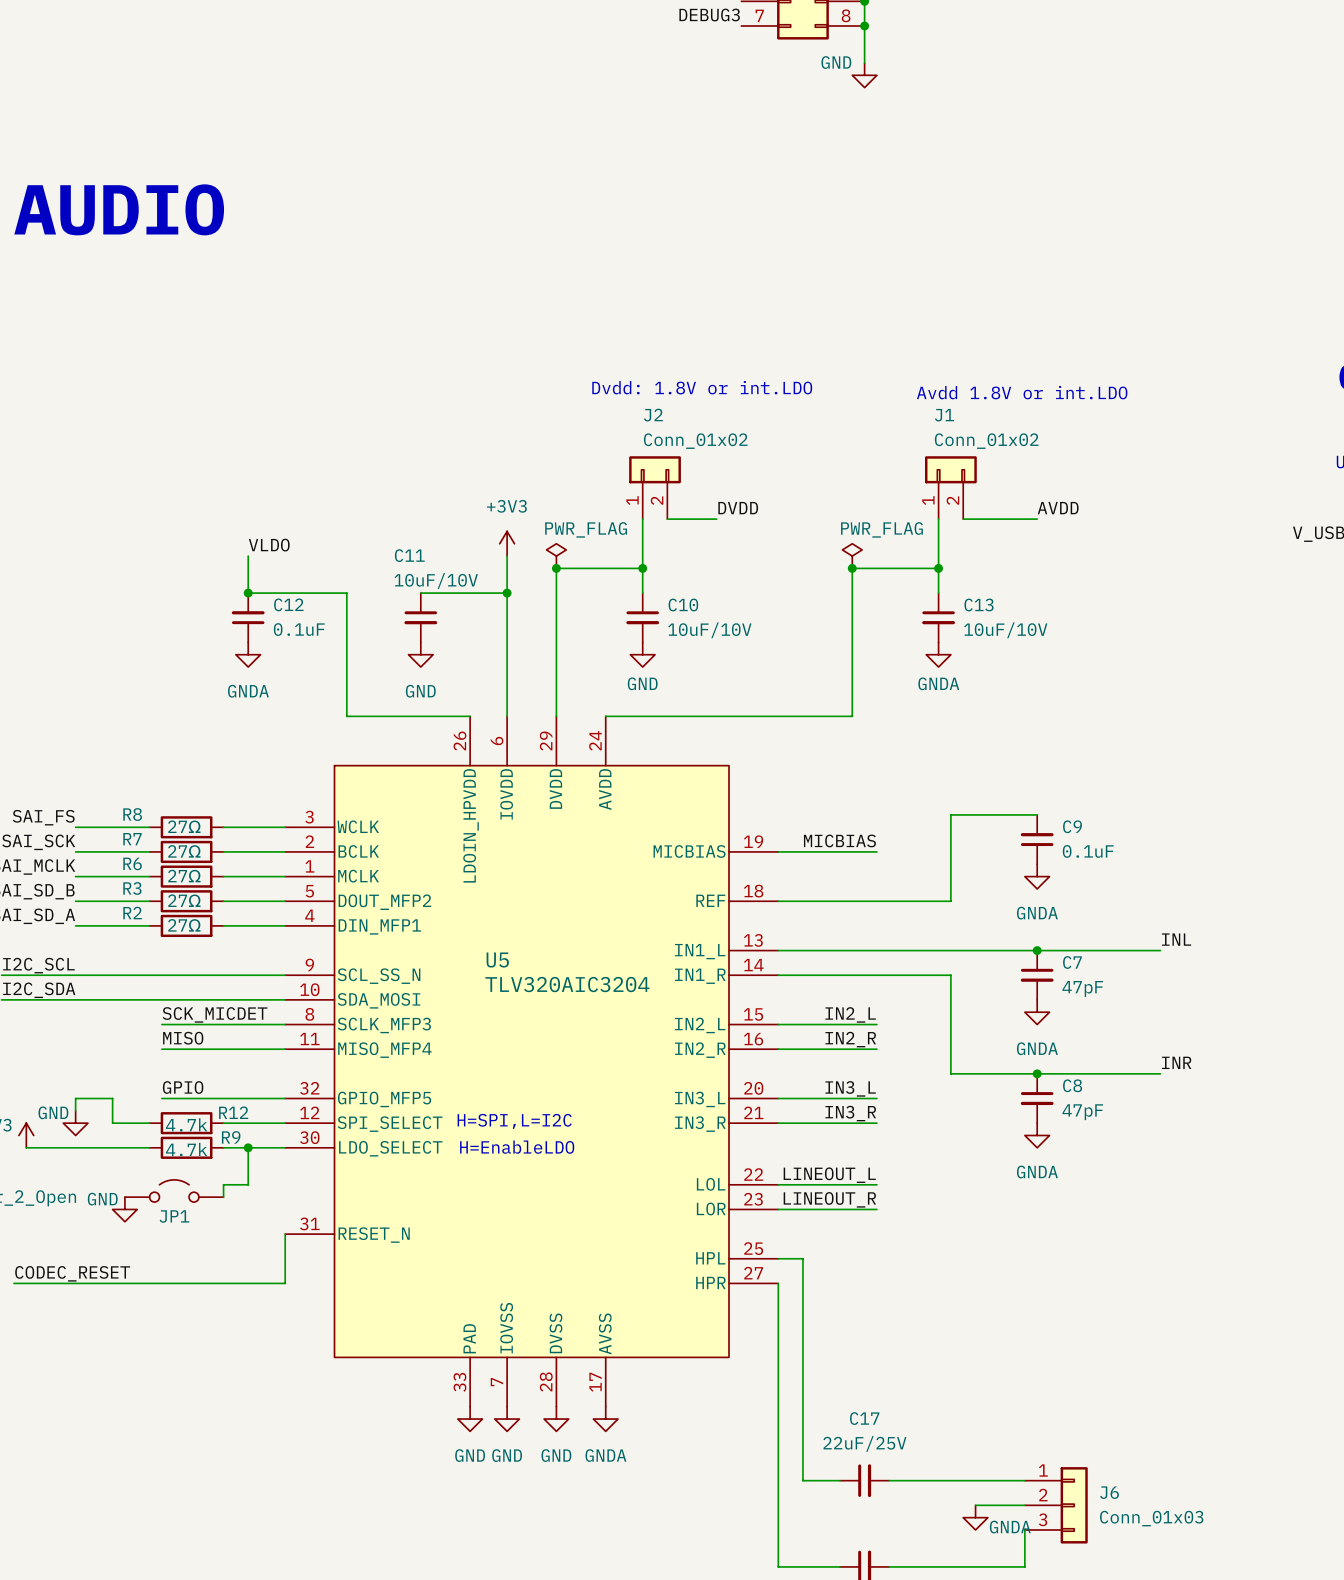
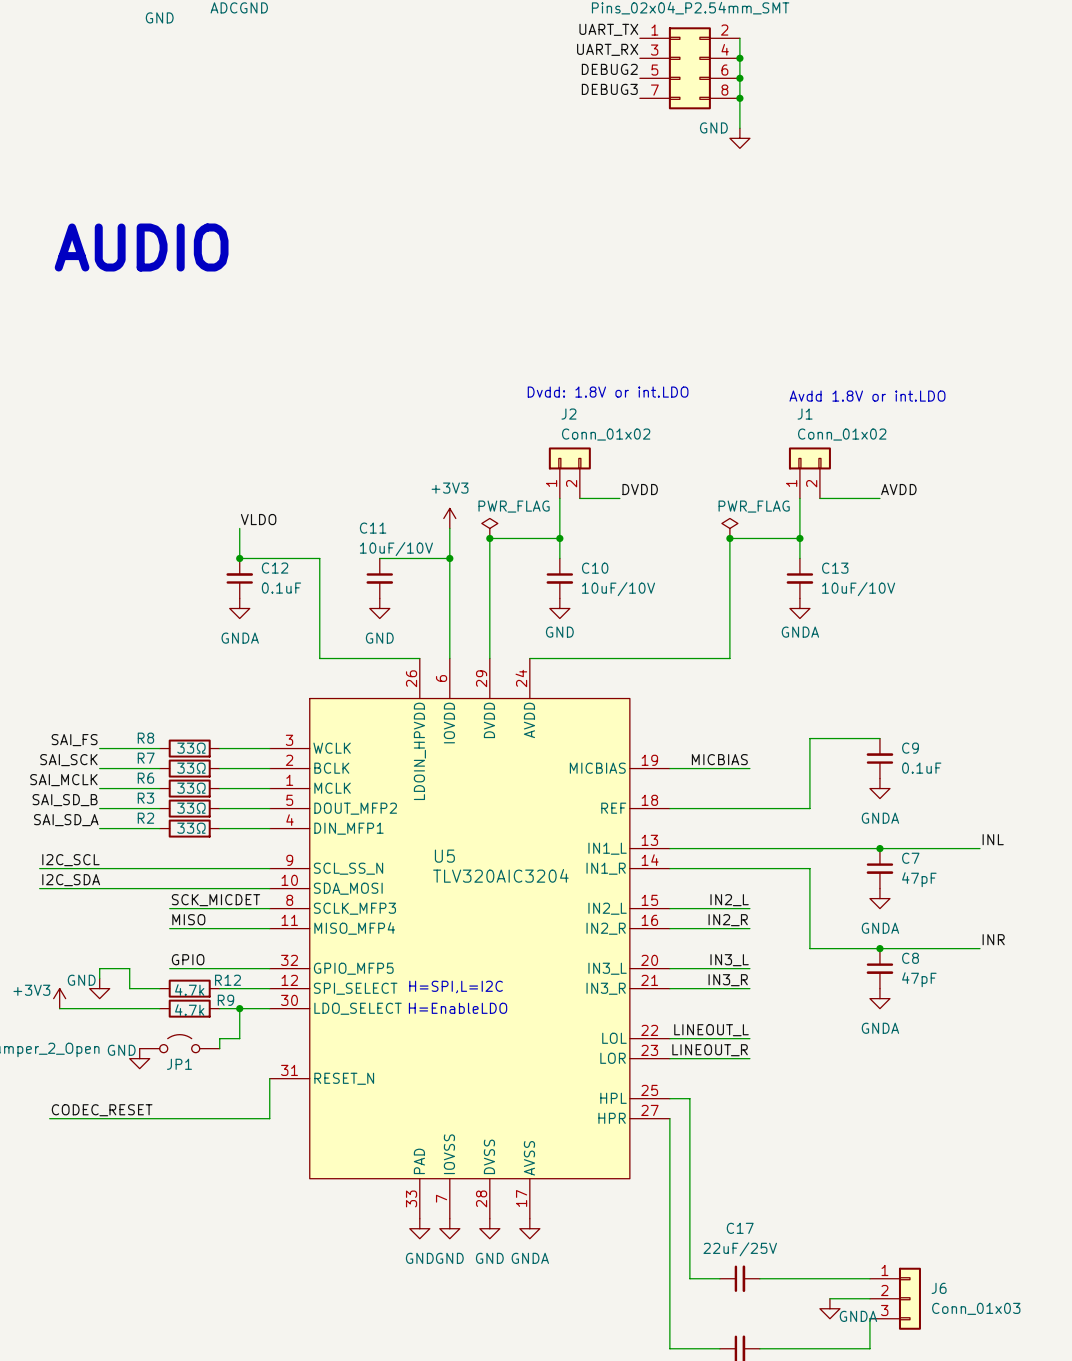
R8 text: 27Ω (184, 826) -> 33Ω (191, 748)
R7 text: 27Ω (184, 851) -> 33Ω (191, 768)
R6 text: 27Ω (184, 876) -> 33Ω (191, 788)
R3 text: 27Ω (184, 900) -> 33Ω (191, 808)
R2 text: 27Ω (184, 925) -> 33Ω (191, 828)

